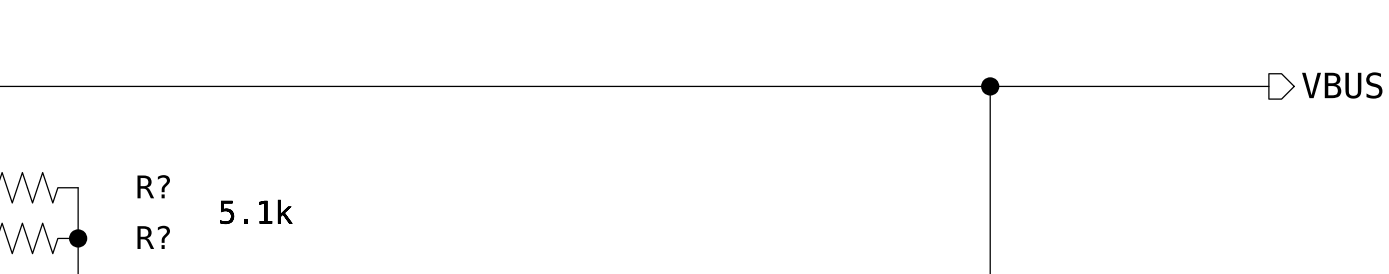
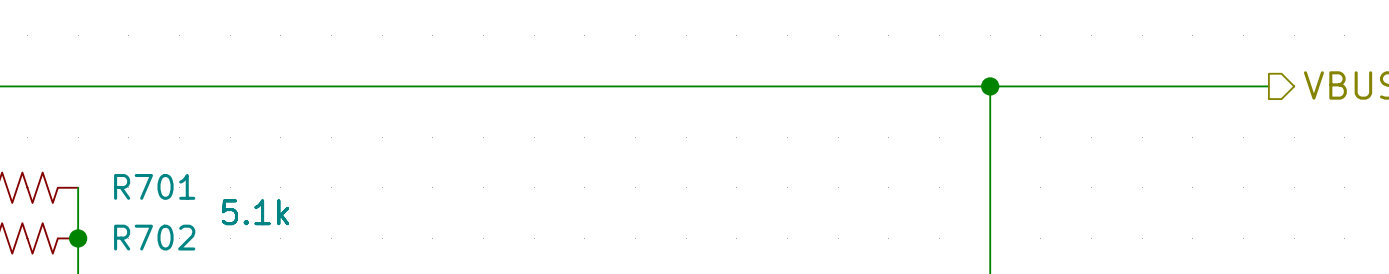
R? name: R? (153, 186) -> R701 (154, 186)
R? name: R? (153, 237) -> R702 (154, 237)

